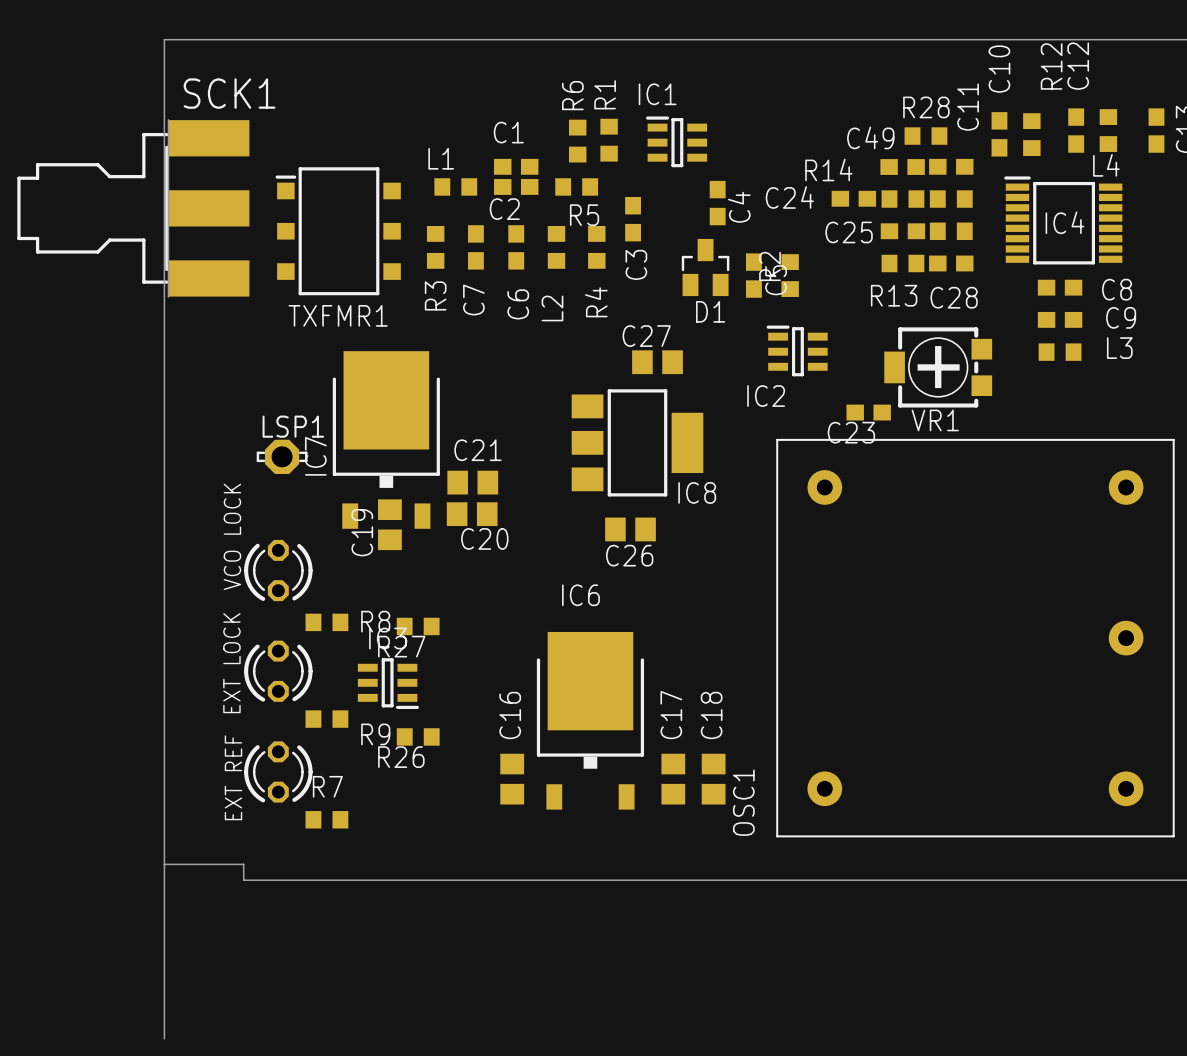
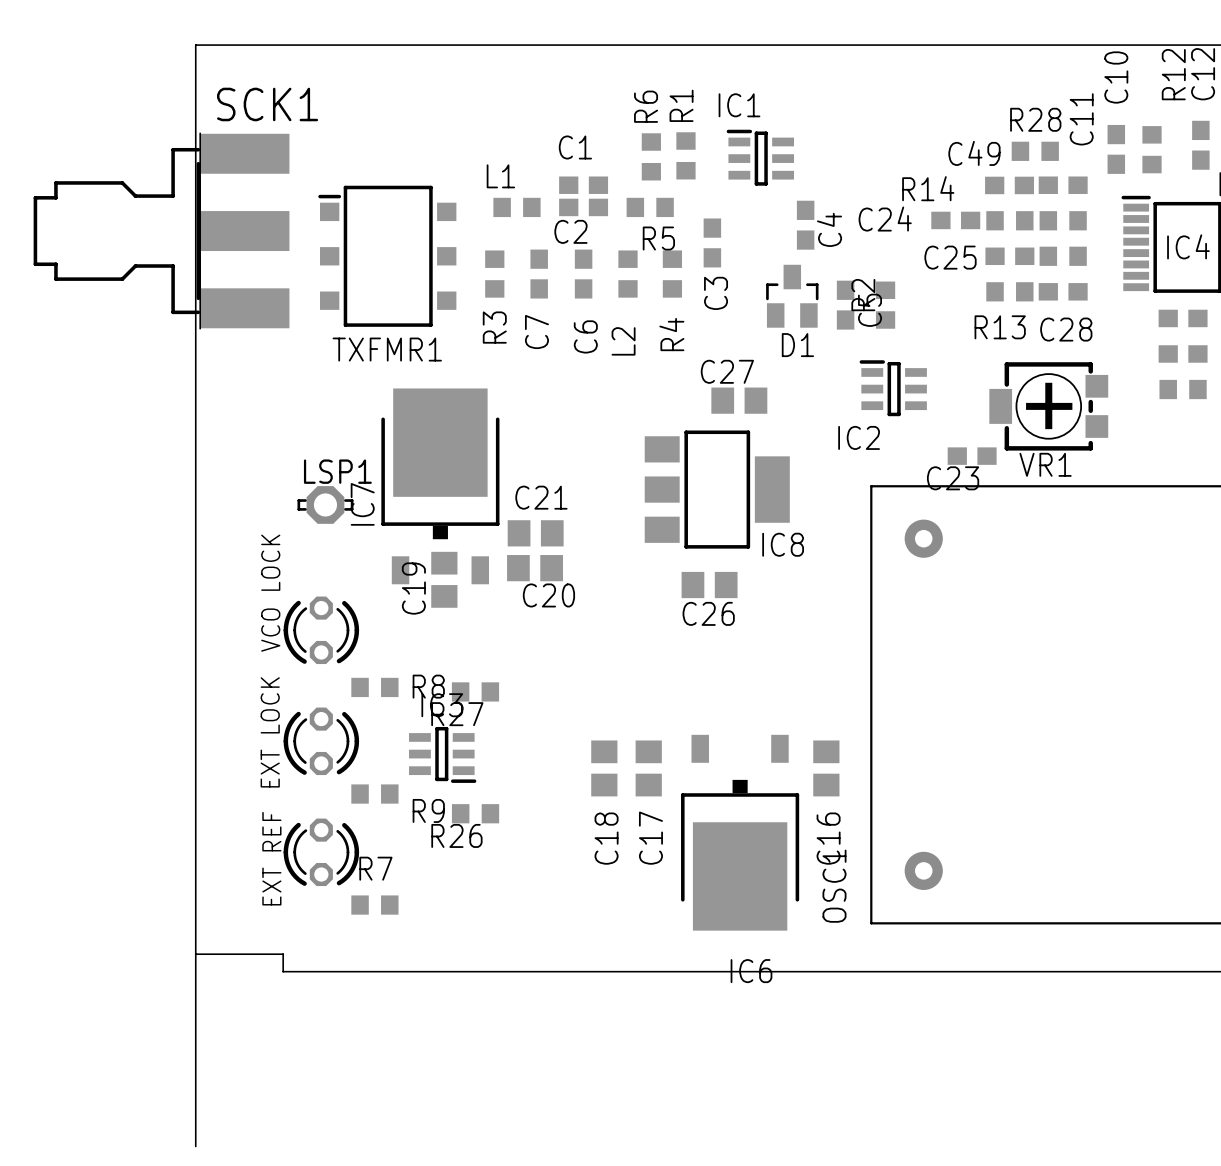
C16 name position: C16 (510, 715) -> C16 (828, 838)
C17 name position: C17 (671, 715) -> C17 (650, 838)
C18 name position: C18 (711, 715) -> C18 (606, 838)
IC6 rotation: 0° (590, 720) -> 180° (740, 832)
C16 position: (512, 779) -> (826, 768)
C17 position: (673, 779) -> (648, 768)
C18 position: (713, 779) -> (604, 768)

